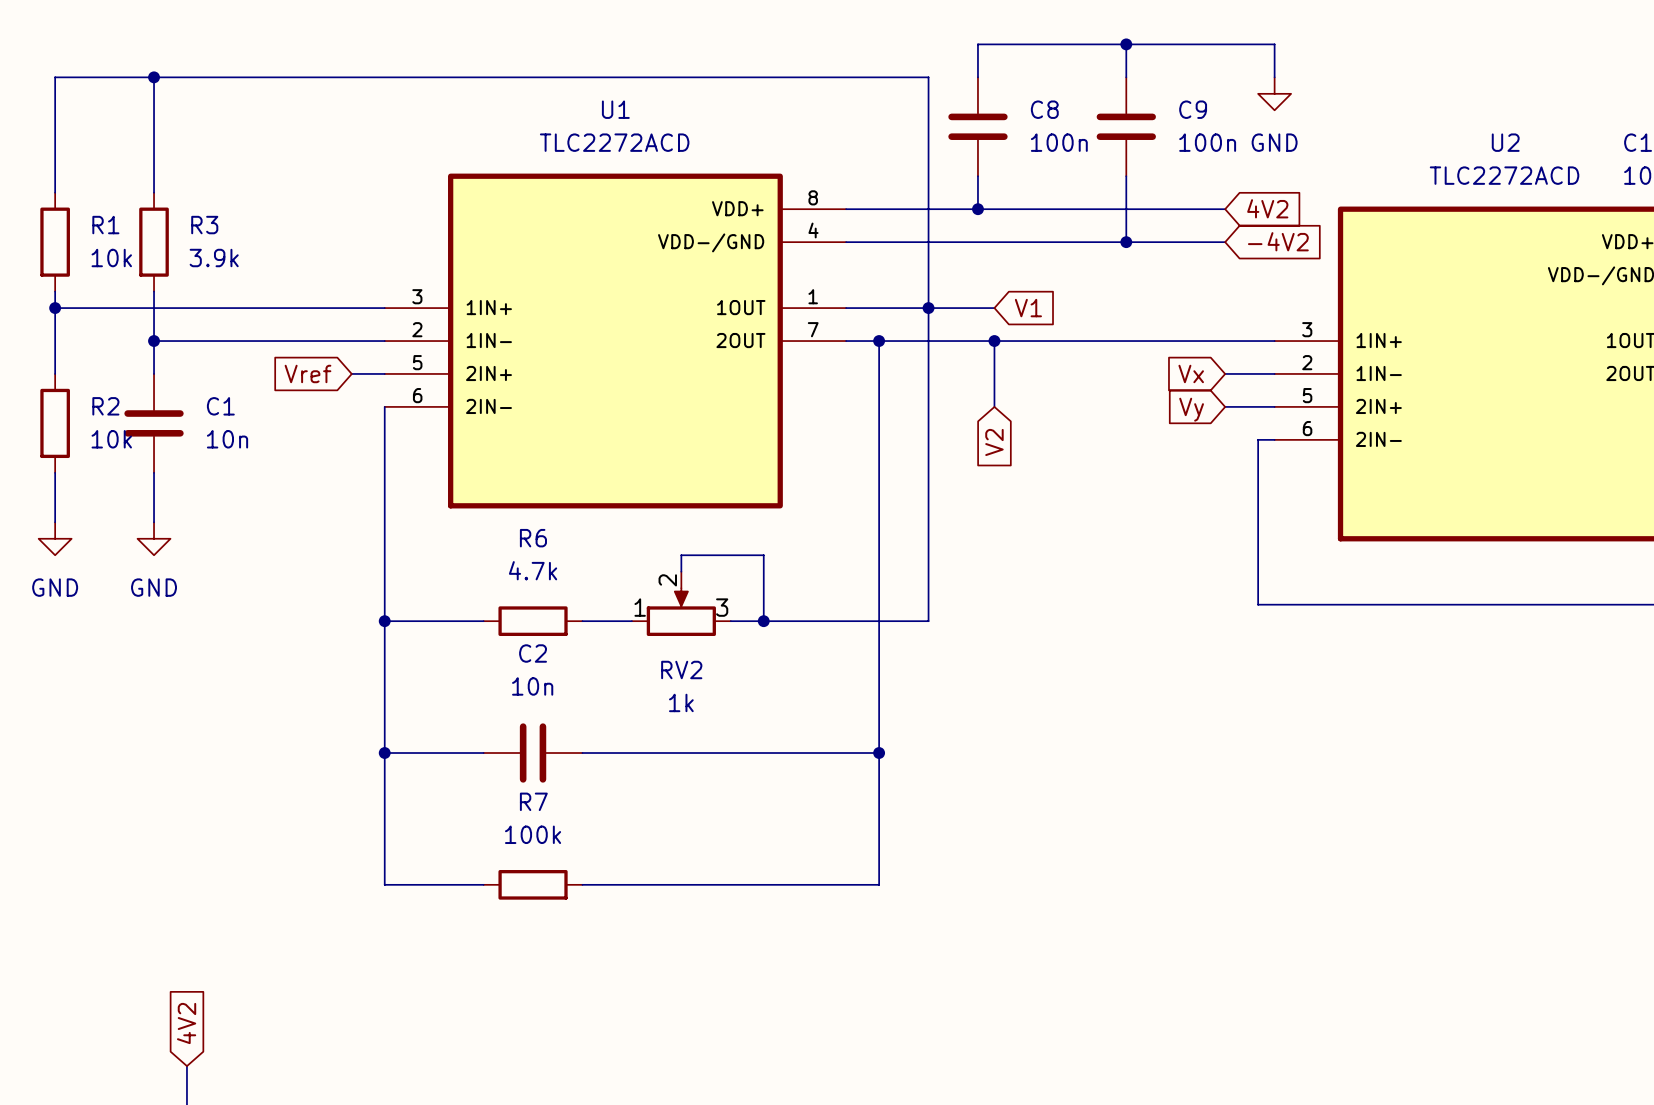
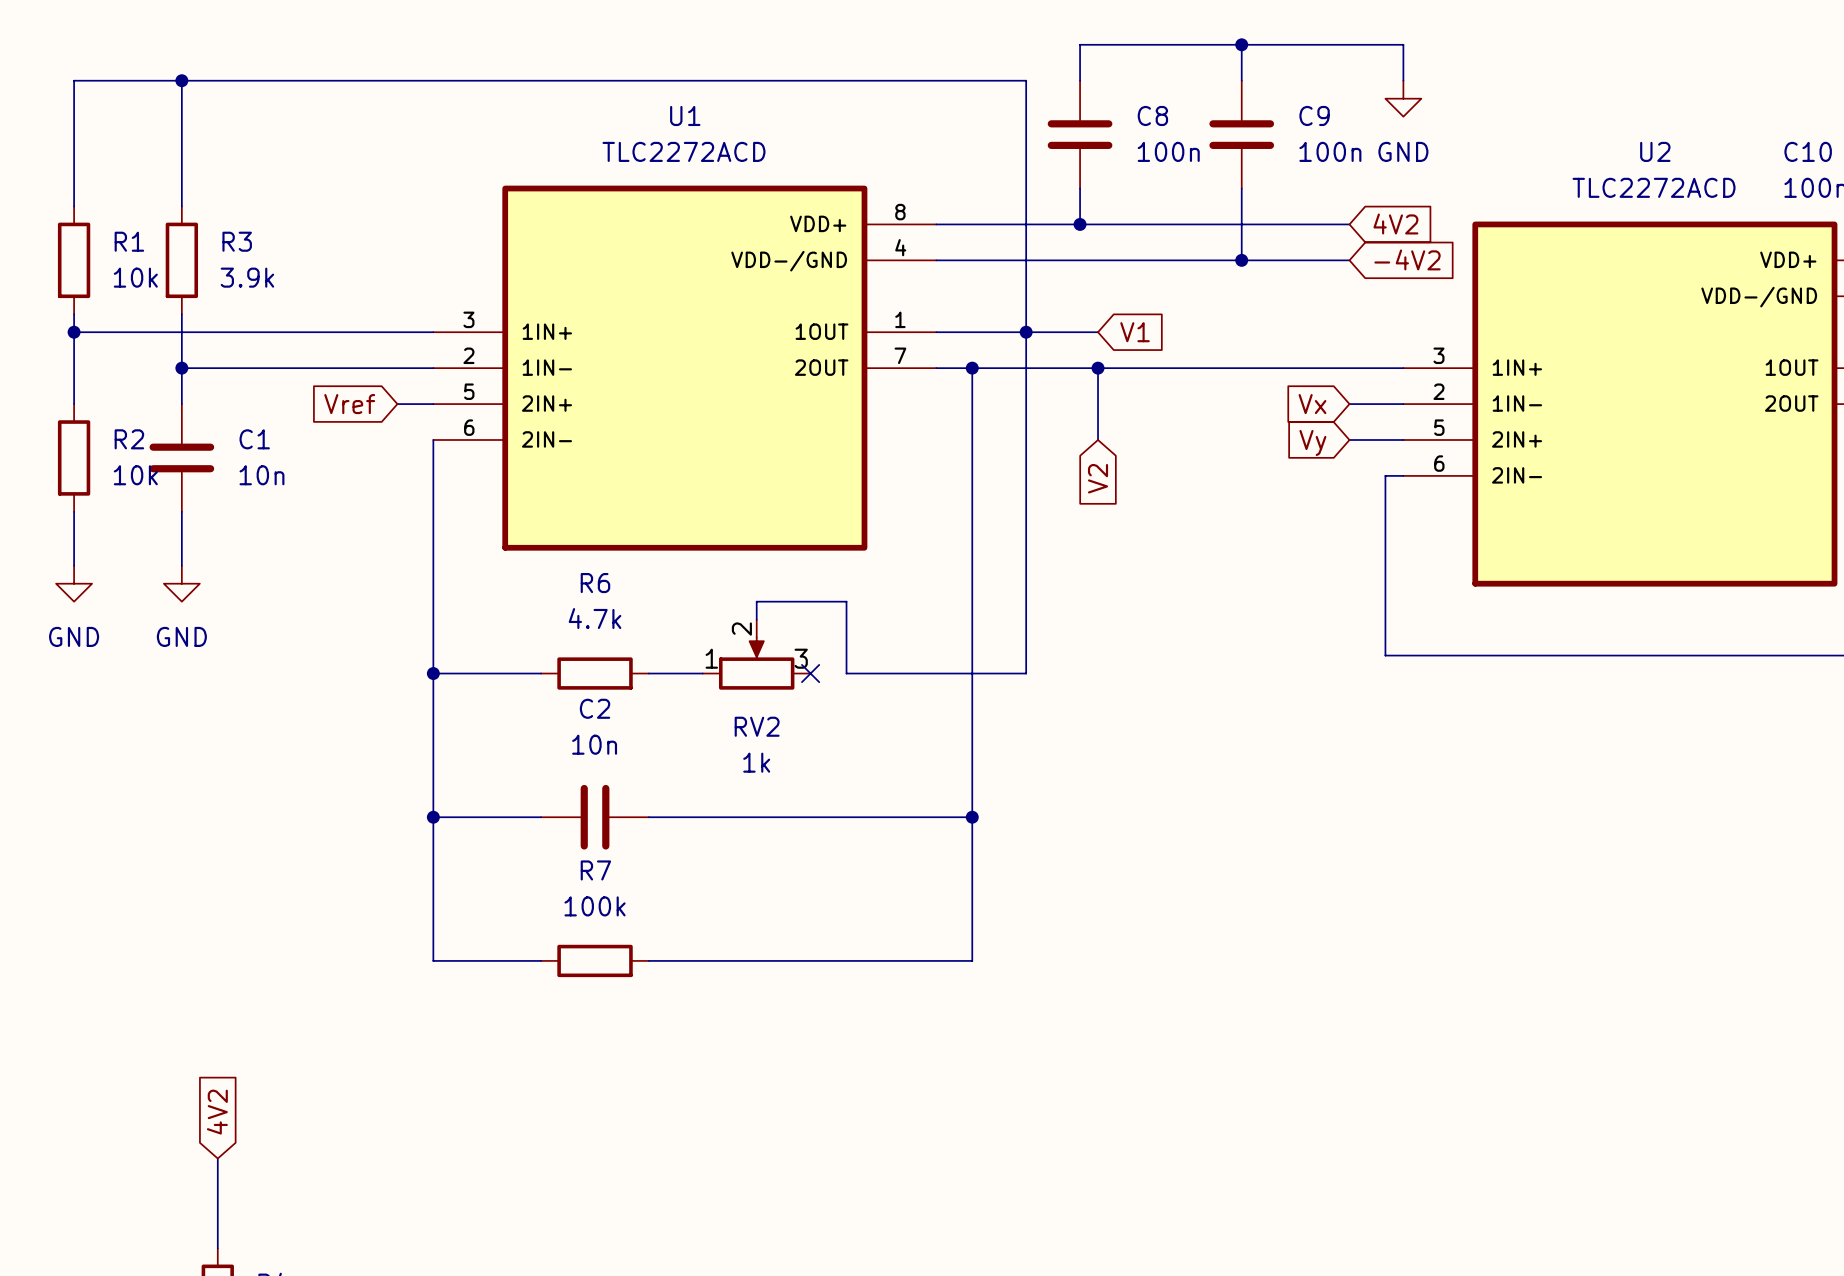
wire: (730, 621) (763, 621) -> none
no-connect mark: none -> (810, 673)
junction: (763, 621) -> none

